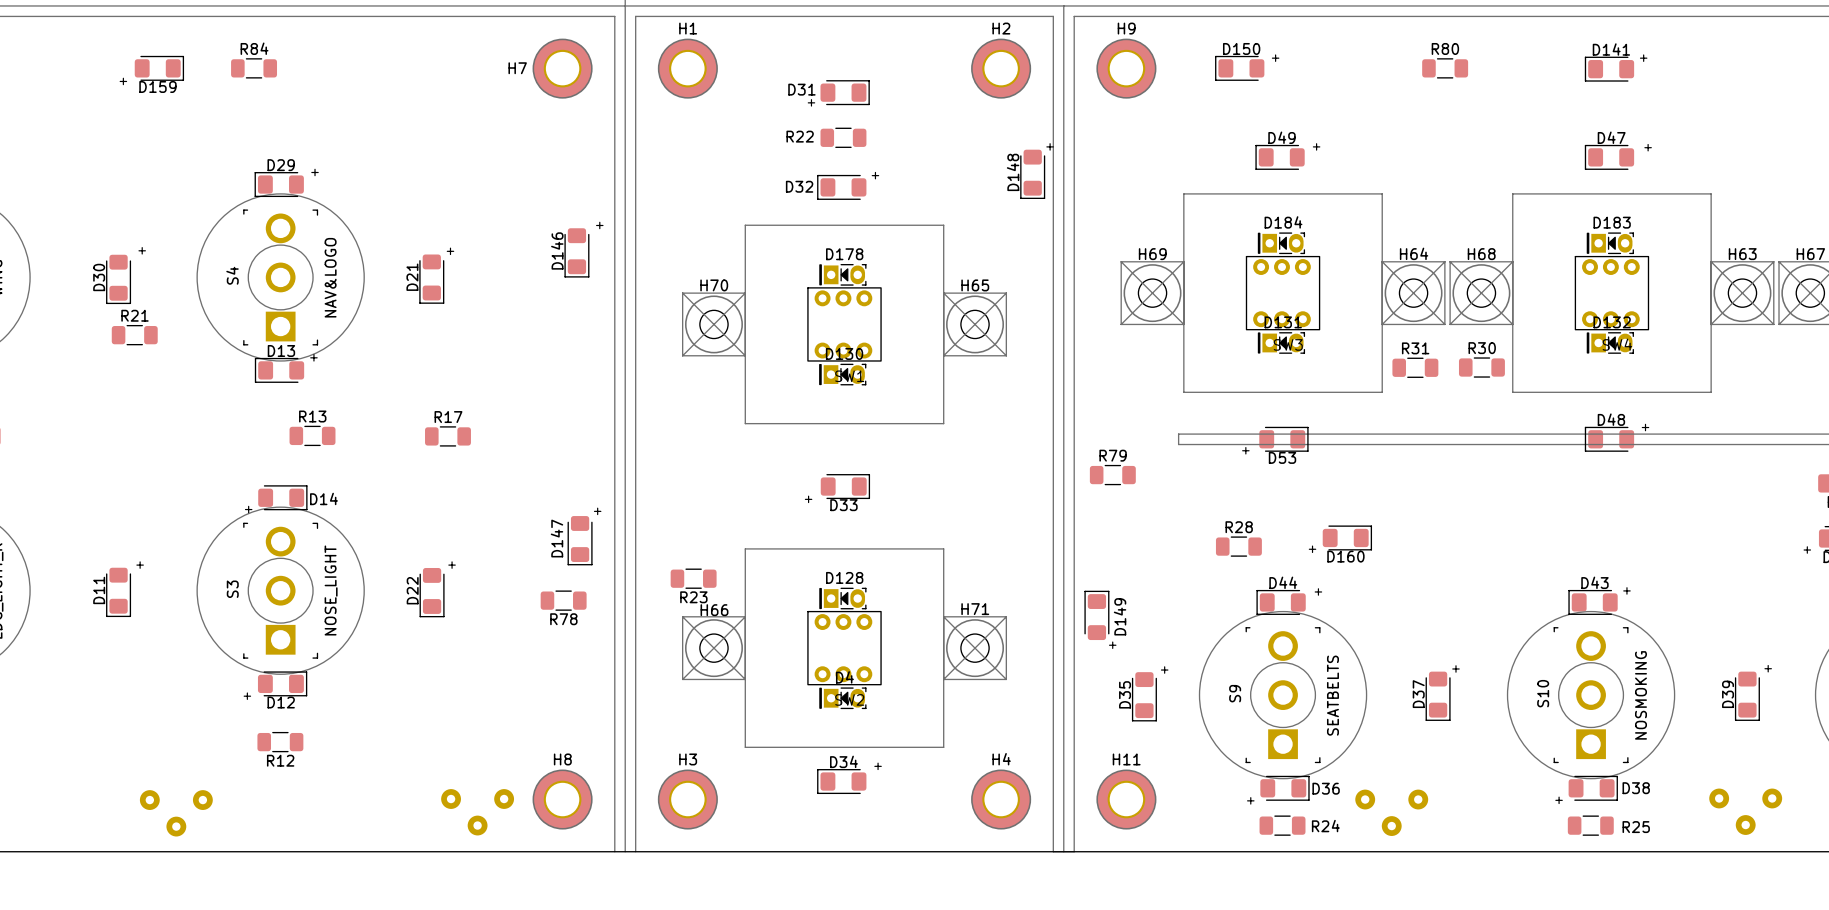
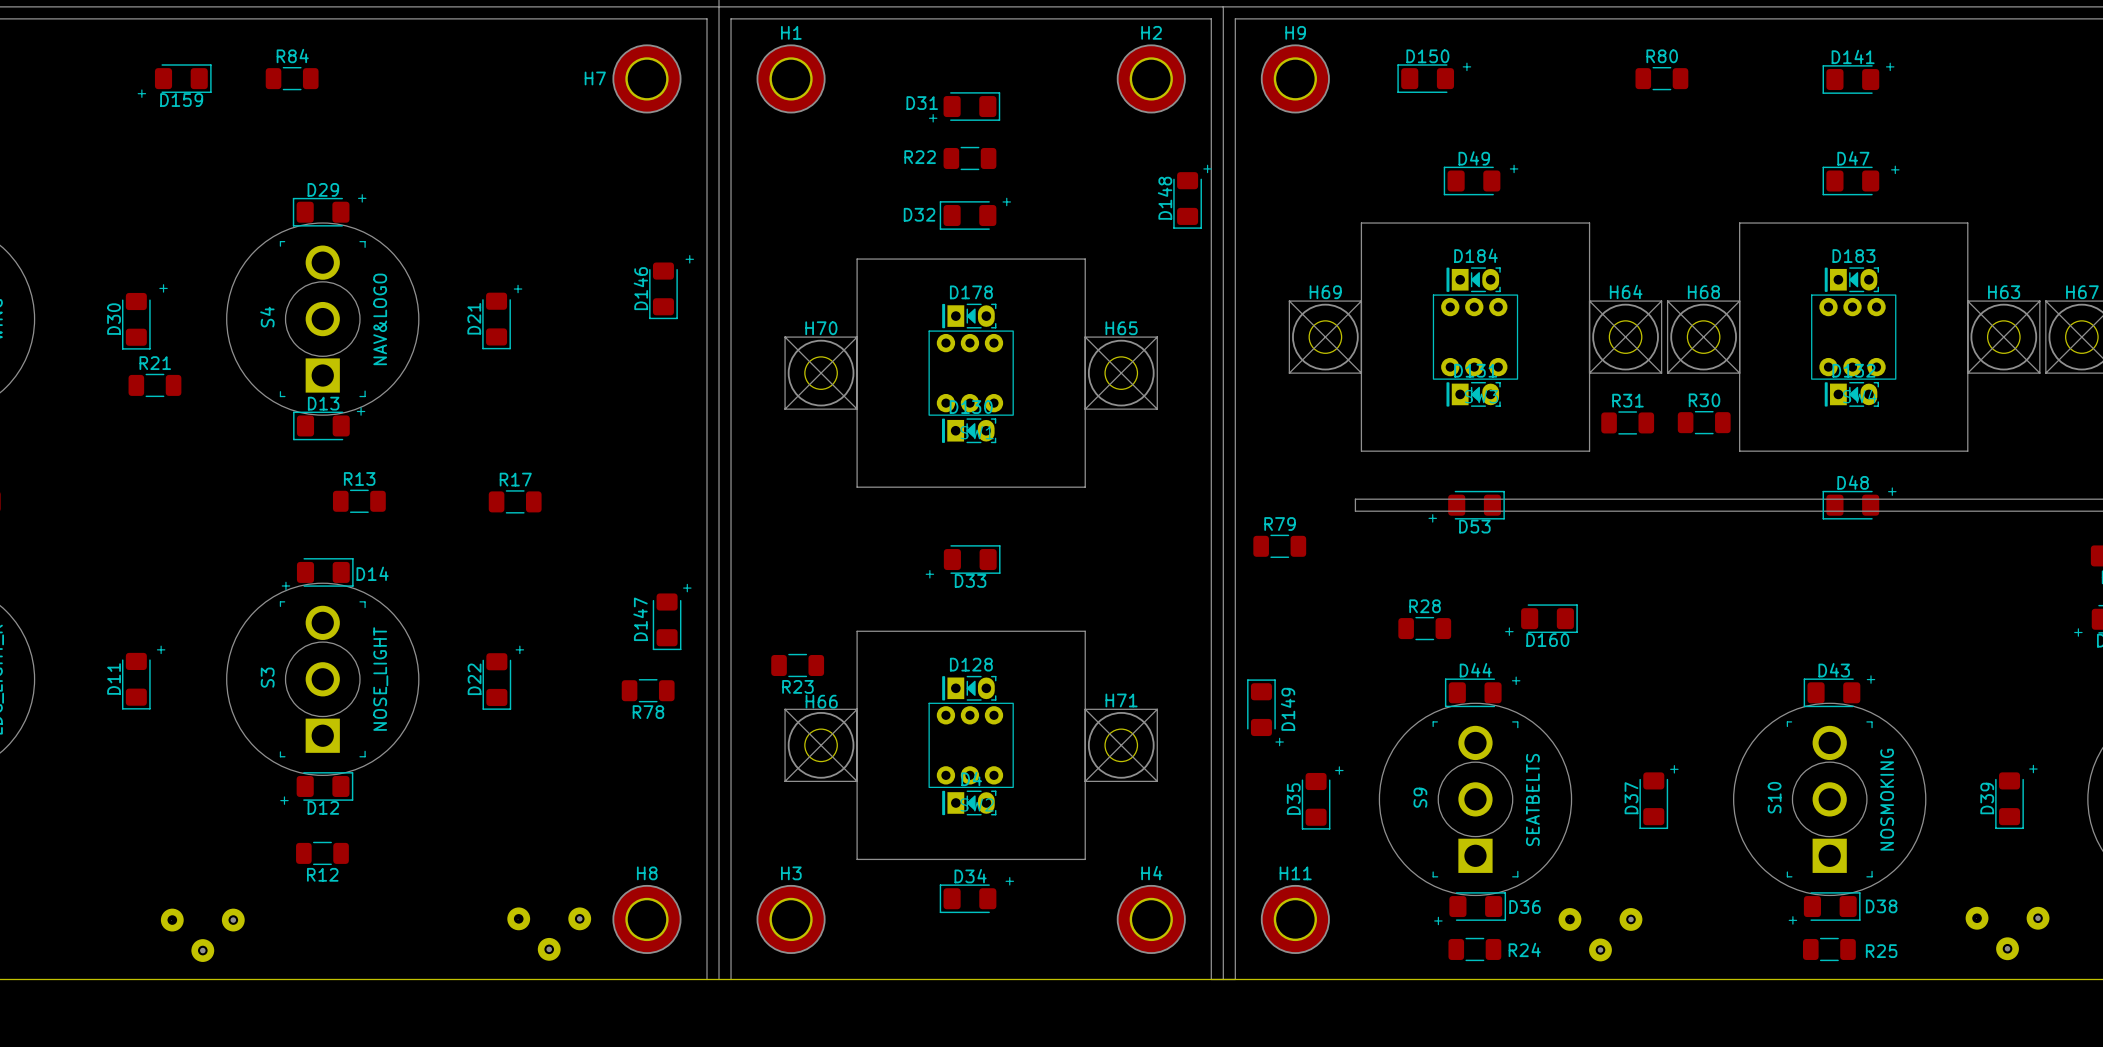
part footprint: [1709, 788, 1783, 835] -> [1965, 906, 2050, 961]
part footprint: [441, 789, 515, 836] -> [507, 907, 592, 961]
part footprint: [1355, 789, 1429, 836] -> [1558, 908, 1643, 962]
part footprint: [139, 790, 213, 837] -> [160, 908, 245, 962]

